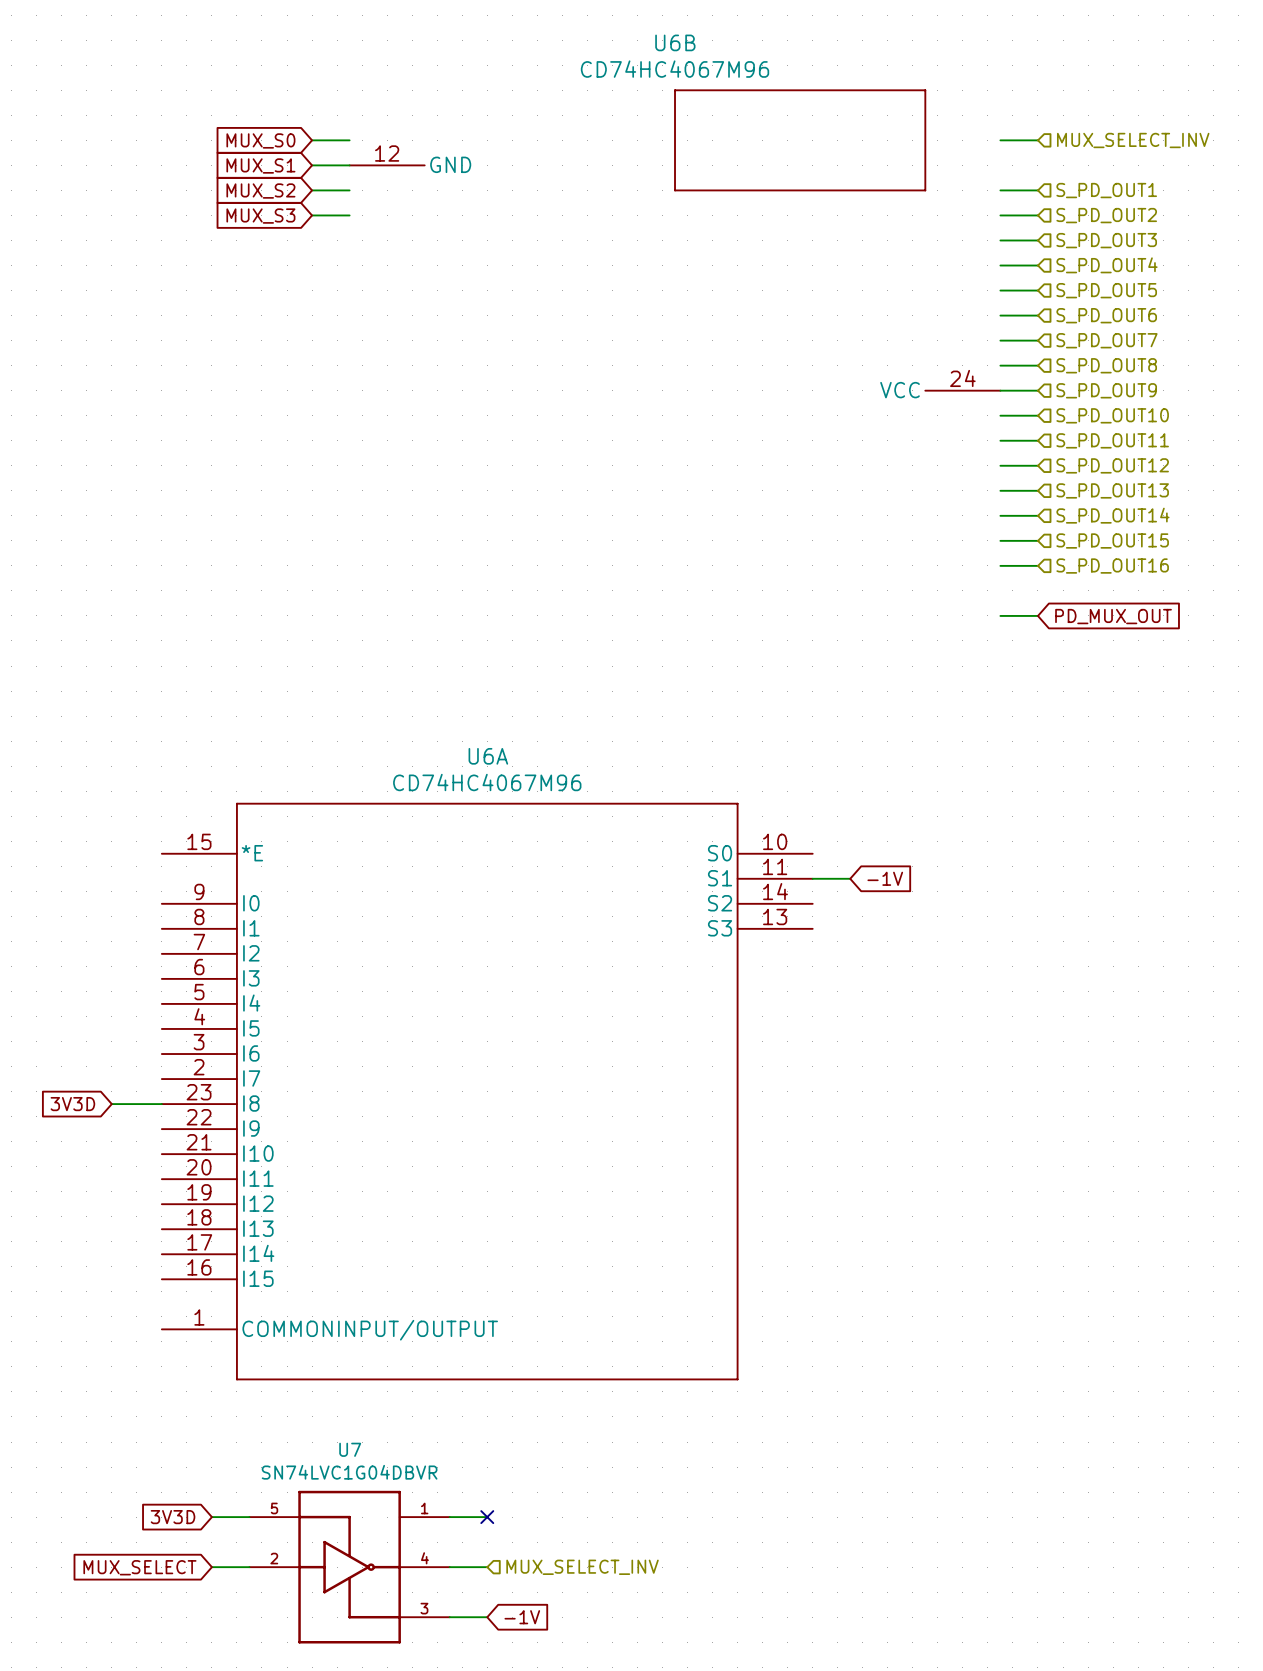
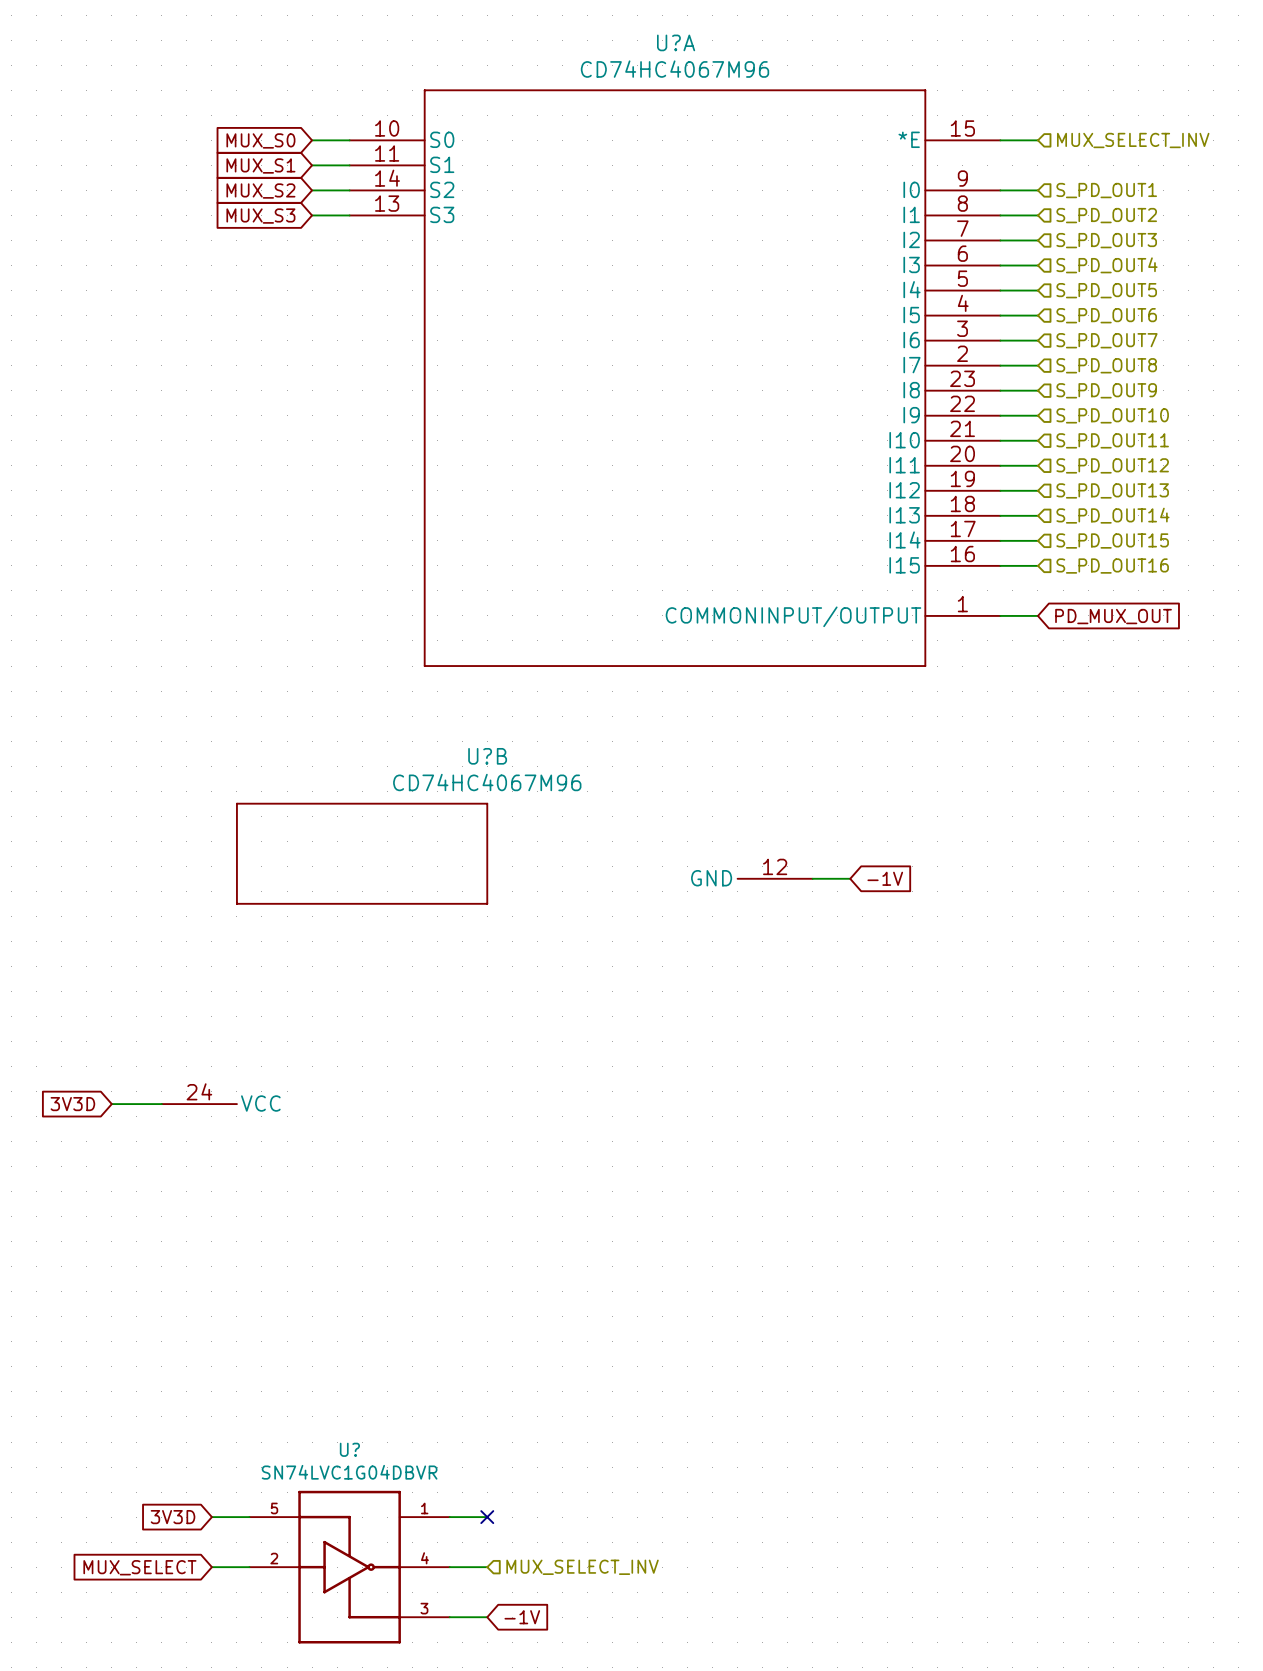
U6B: CD74HC4067M96 (675, 240) -> none
U?A: none -> CD74HC4067M96 (675, 378)
U?B: none -> CD74HC4067M96 (487, 953)
U6A: CD74HC4067M96 (487, 1091) -> none
U7 name: U7 (350, 1449) -> U? (349, 1449)

